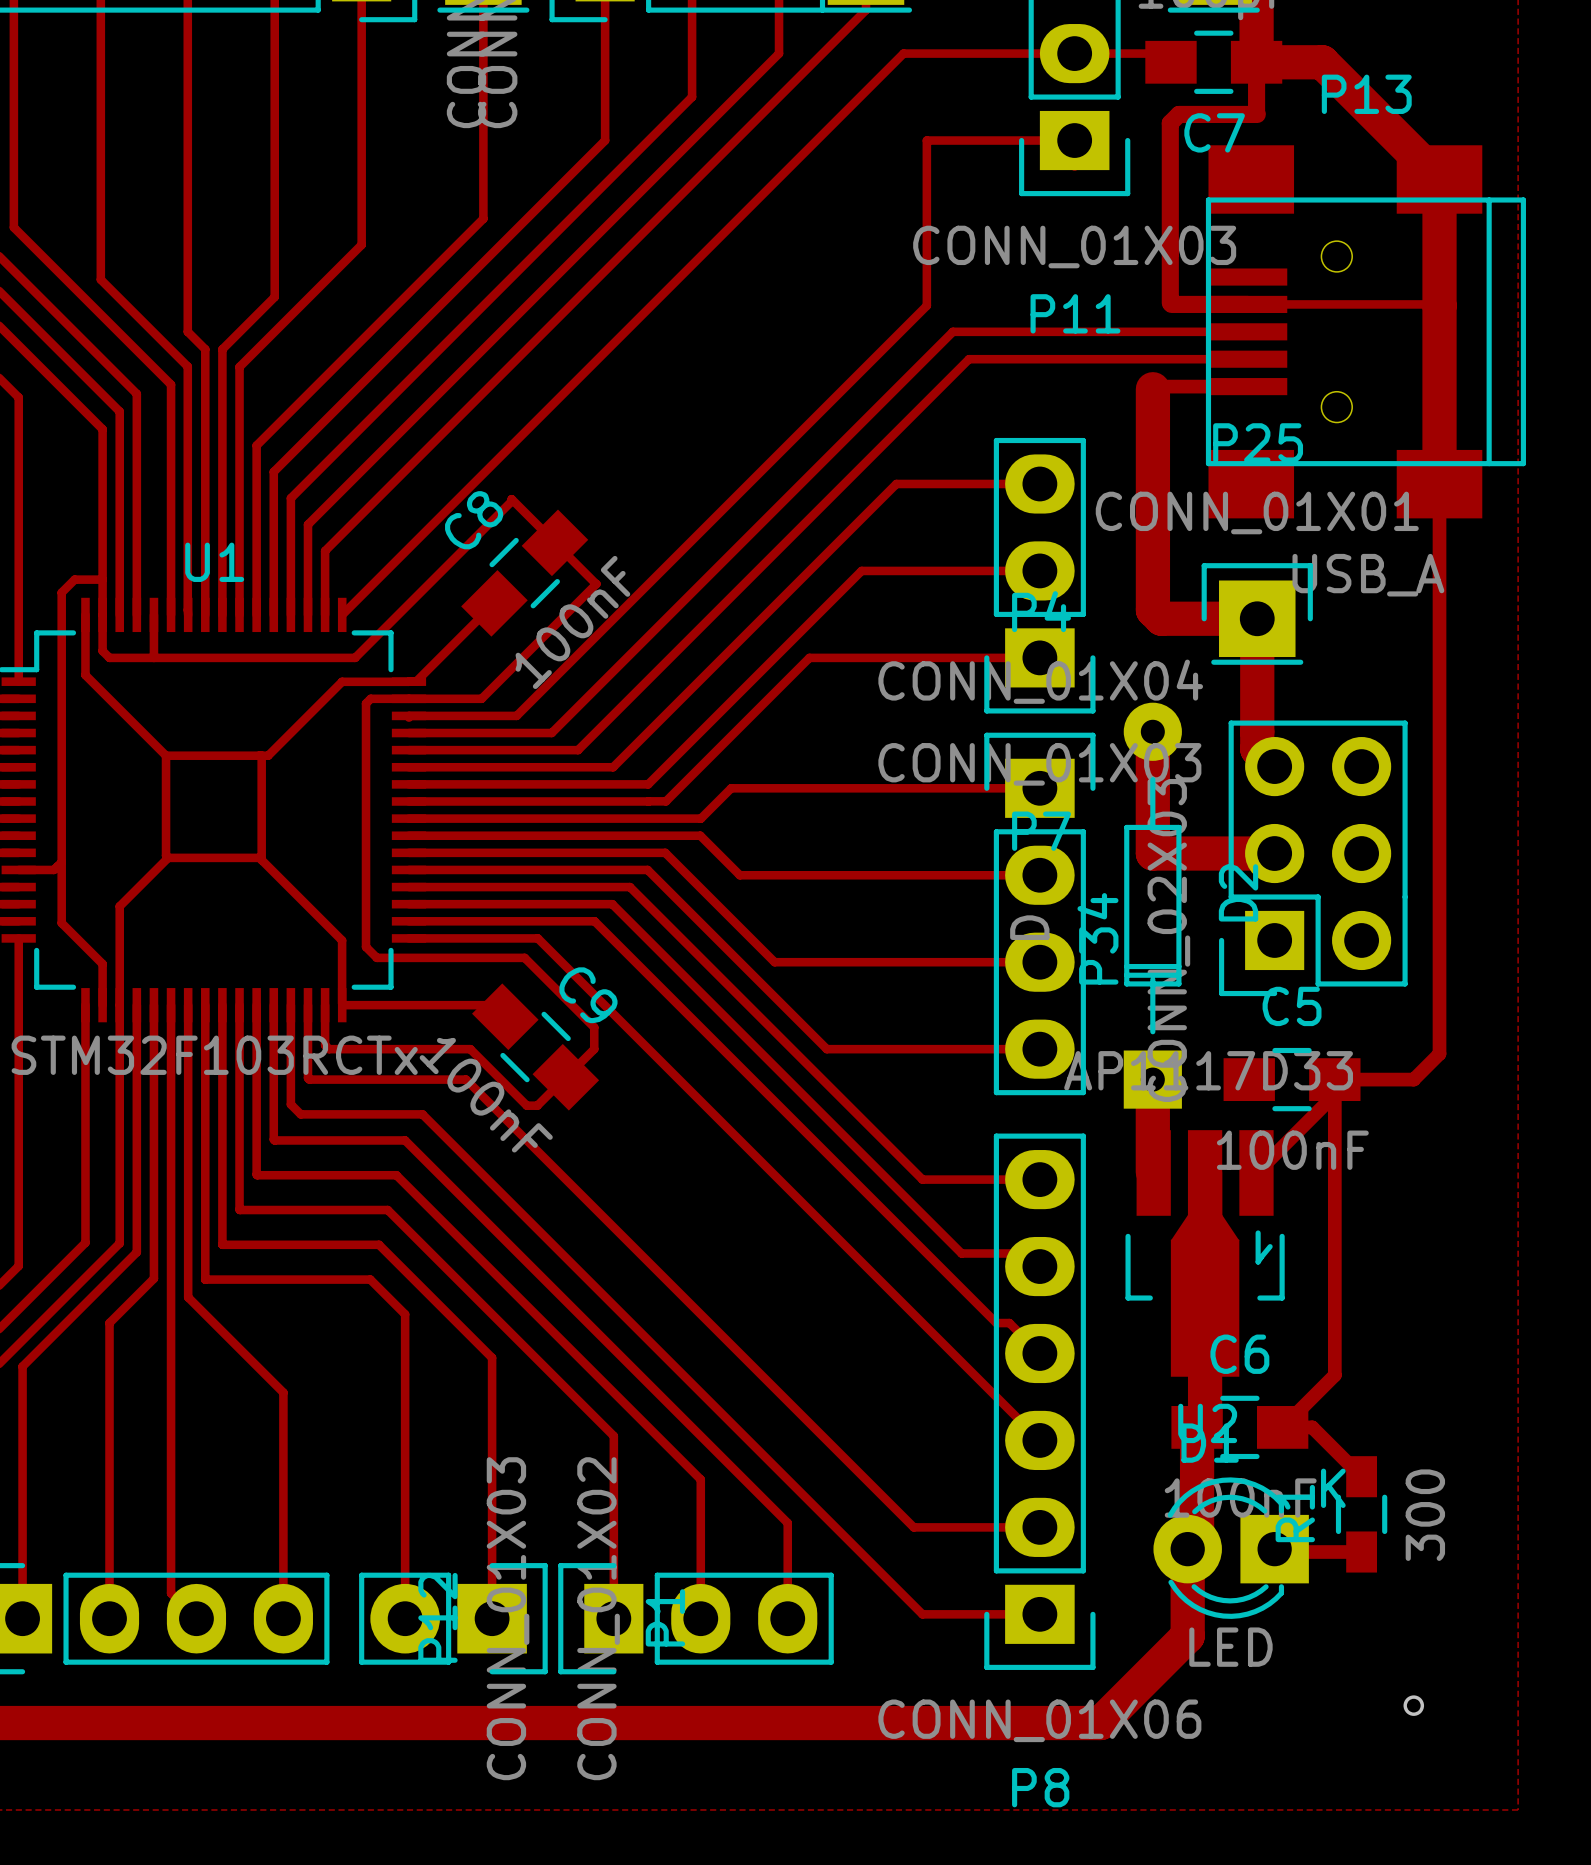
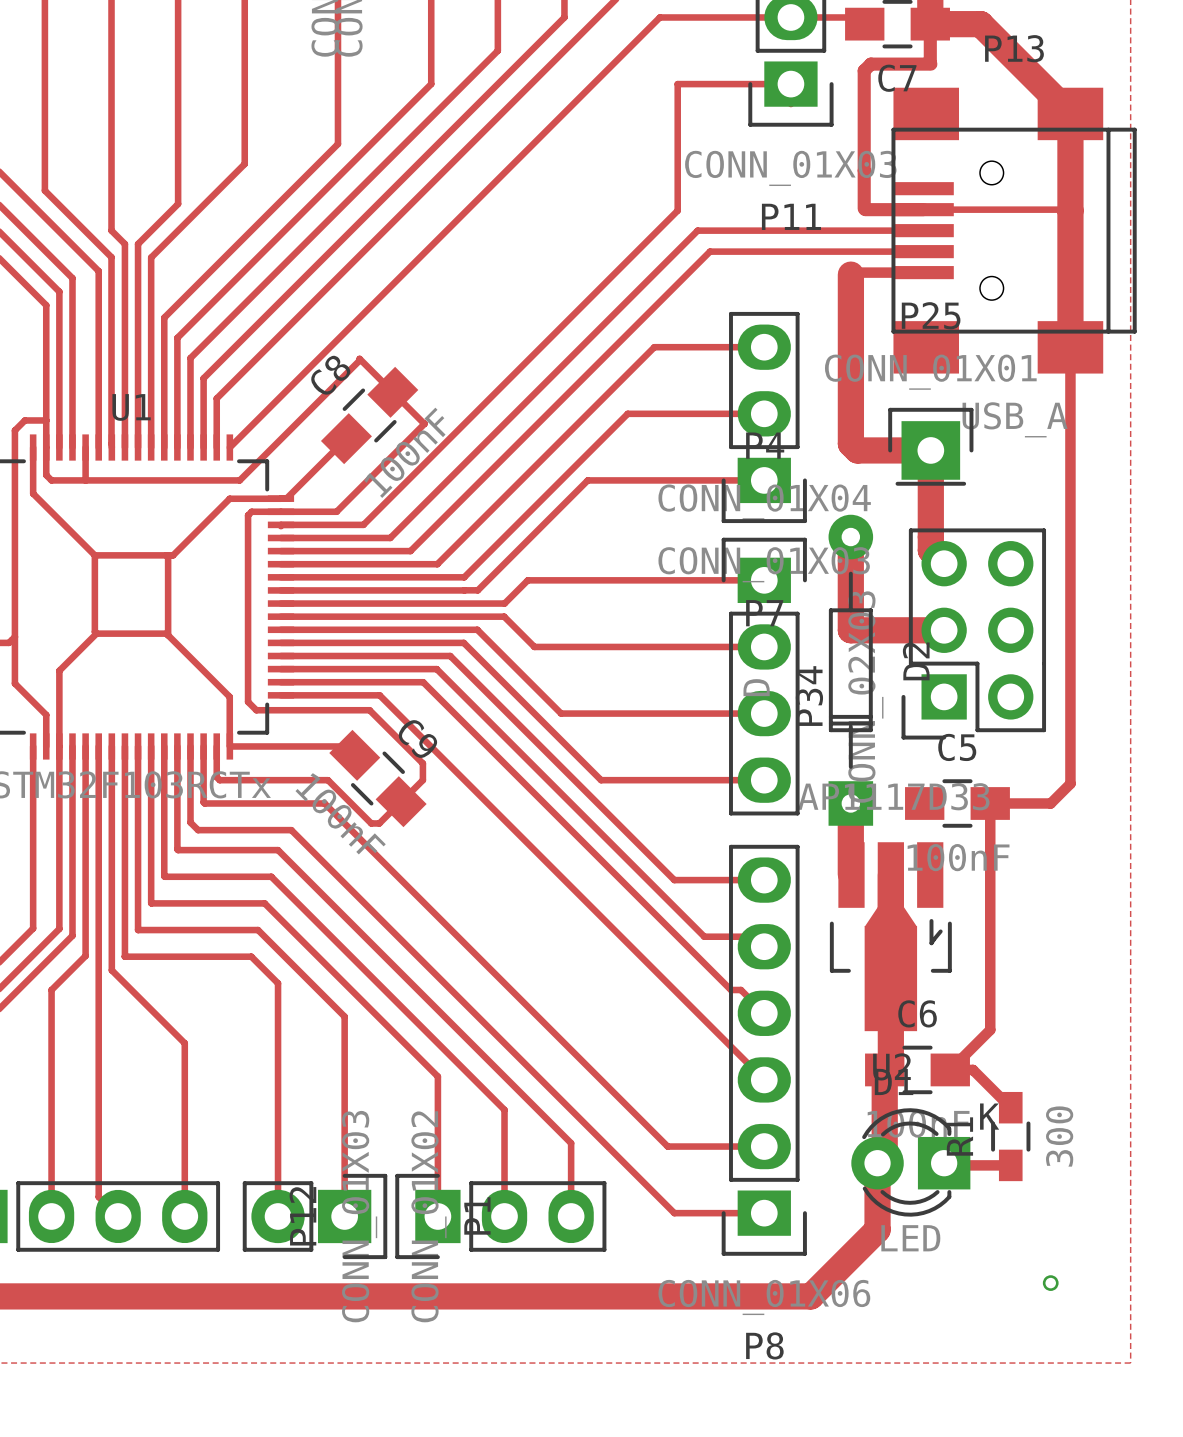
track: (1334, 1094) (1256, 1172) -> none

